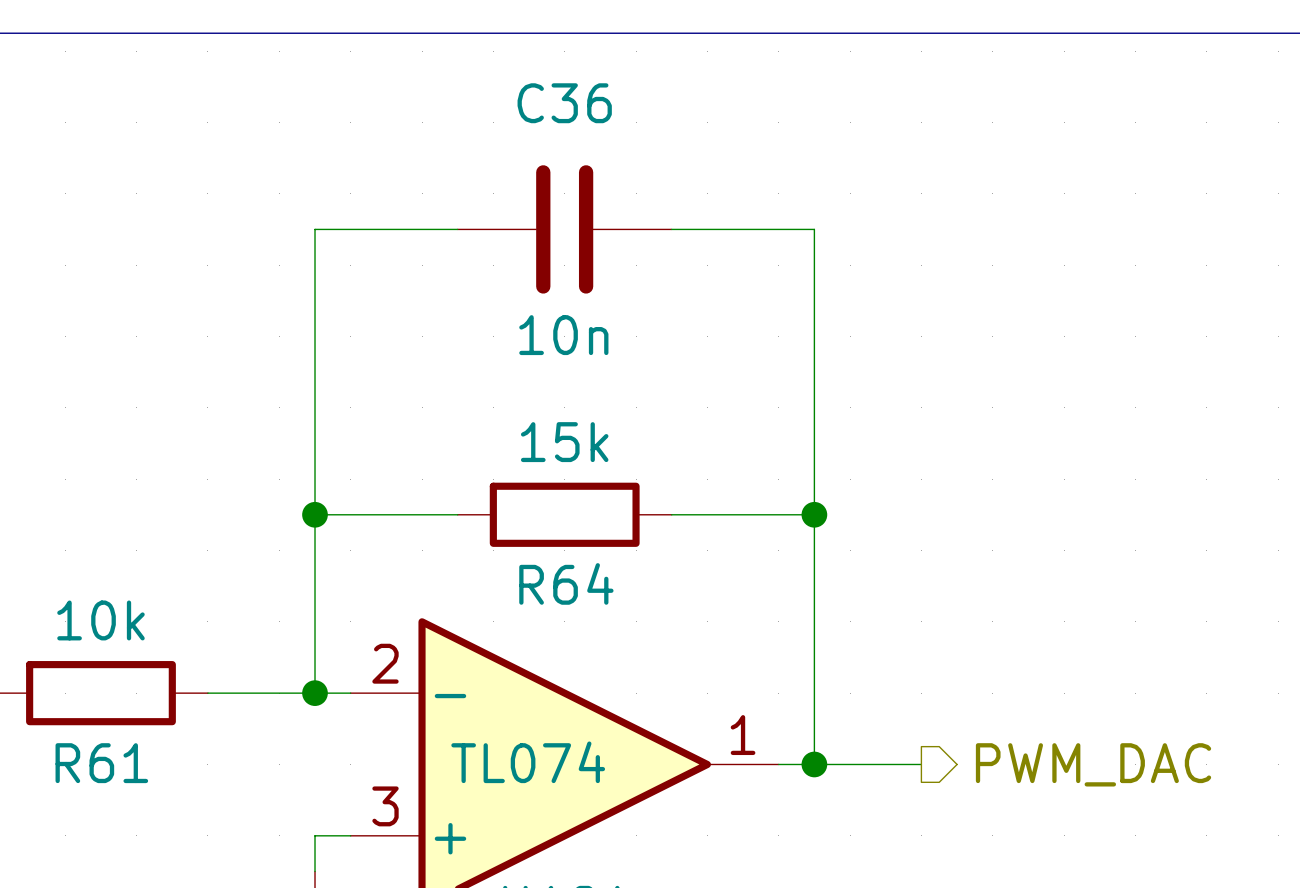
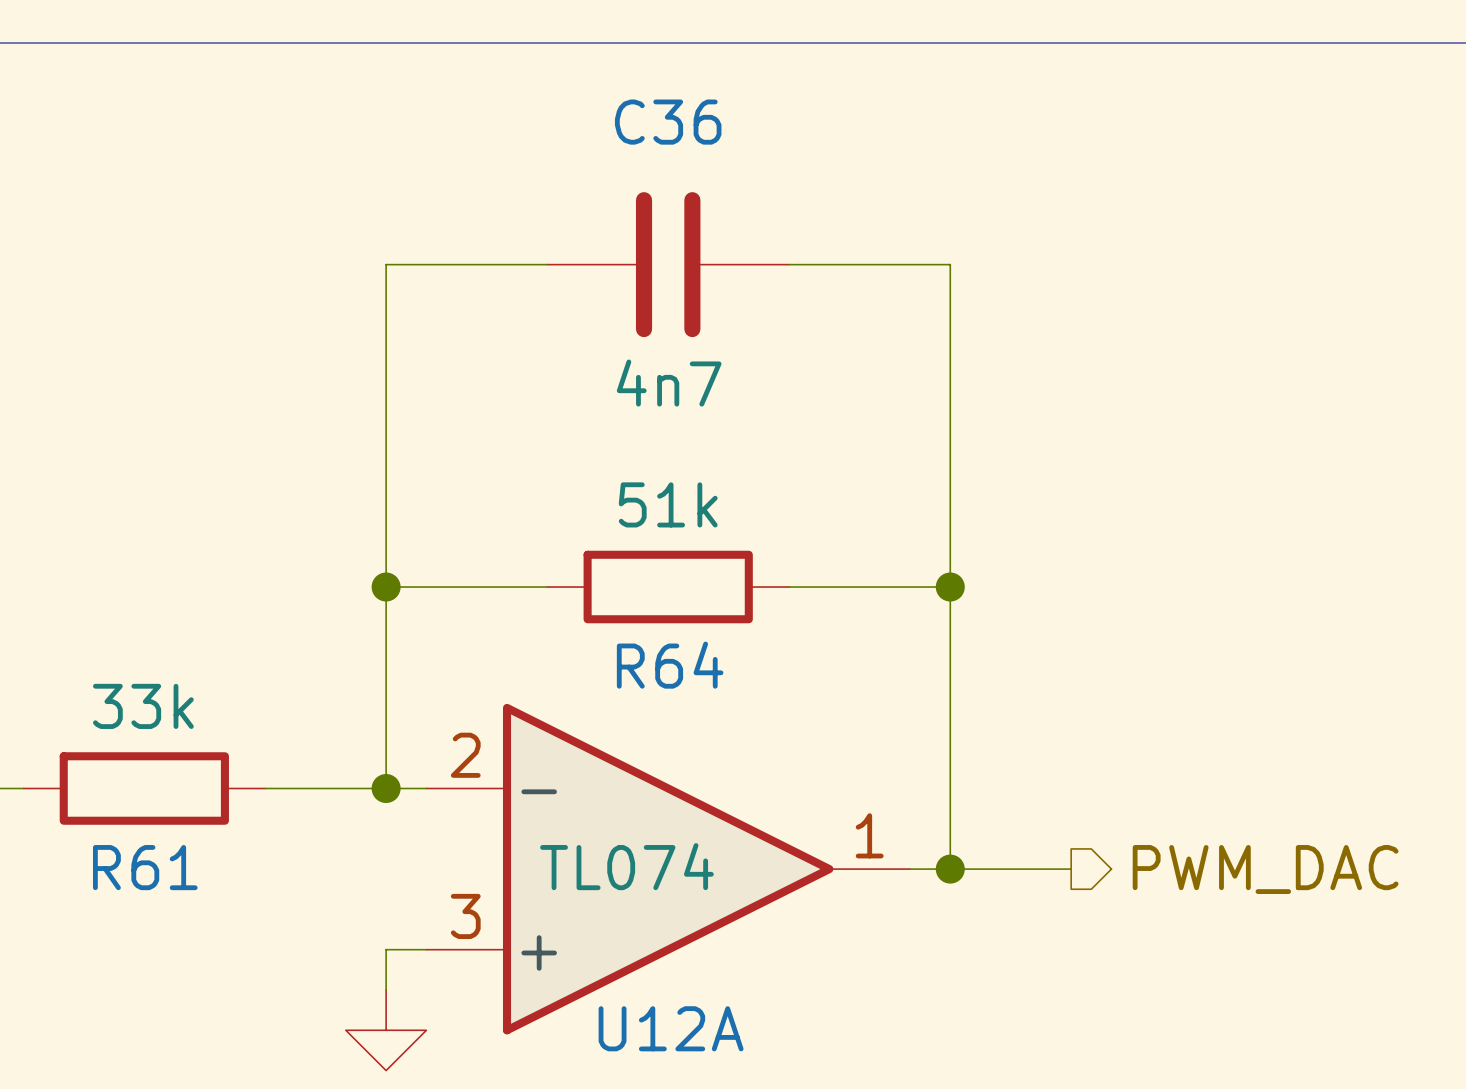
C36 value: 10n (563, 335) -> 4n7 (669, 383)
R64 value: 15k (564, 442) -> 51k (668, 504)
R61 value: 10k (100, 620) -> 33k (143, 706)

